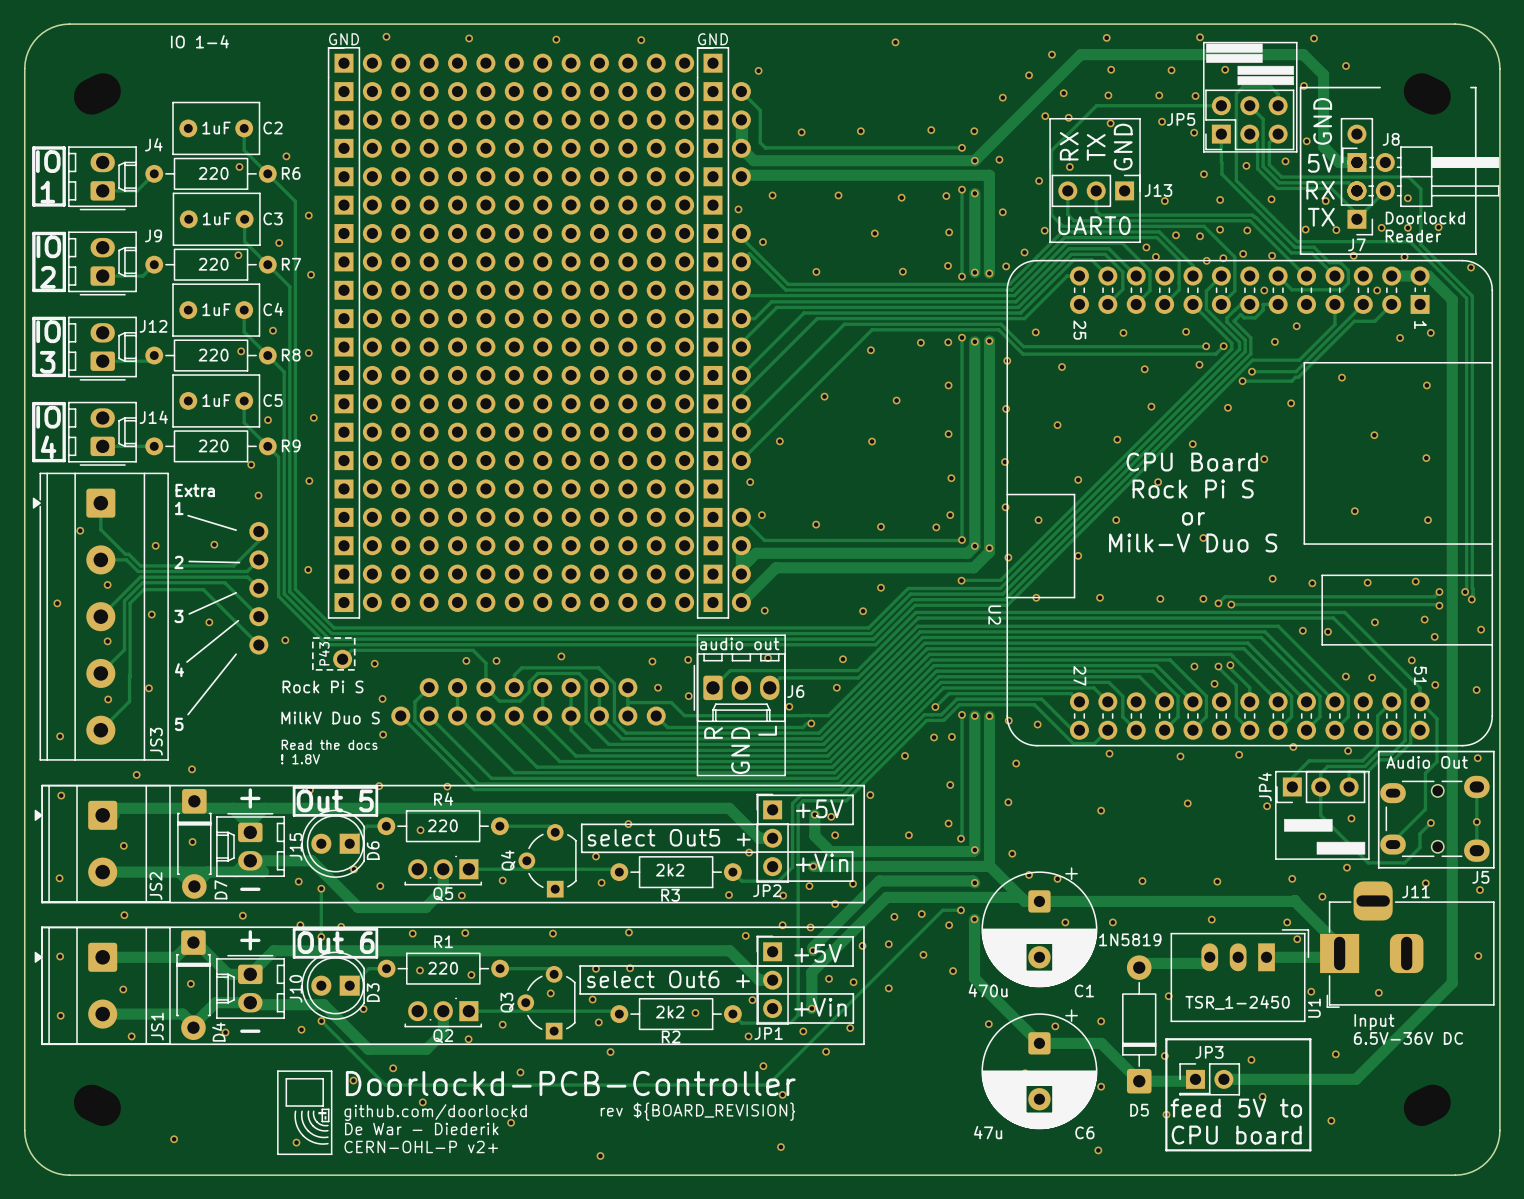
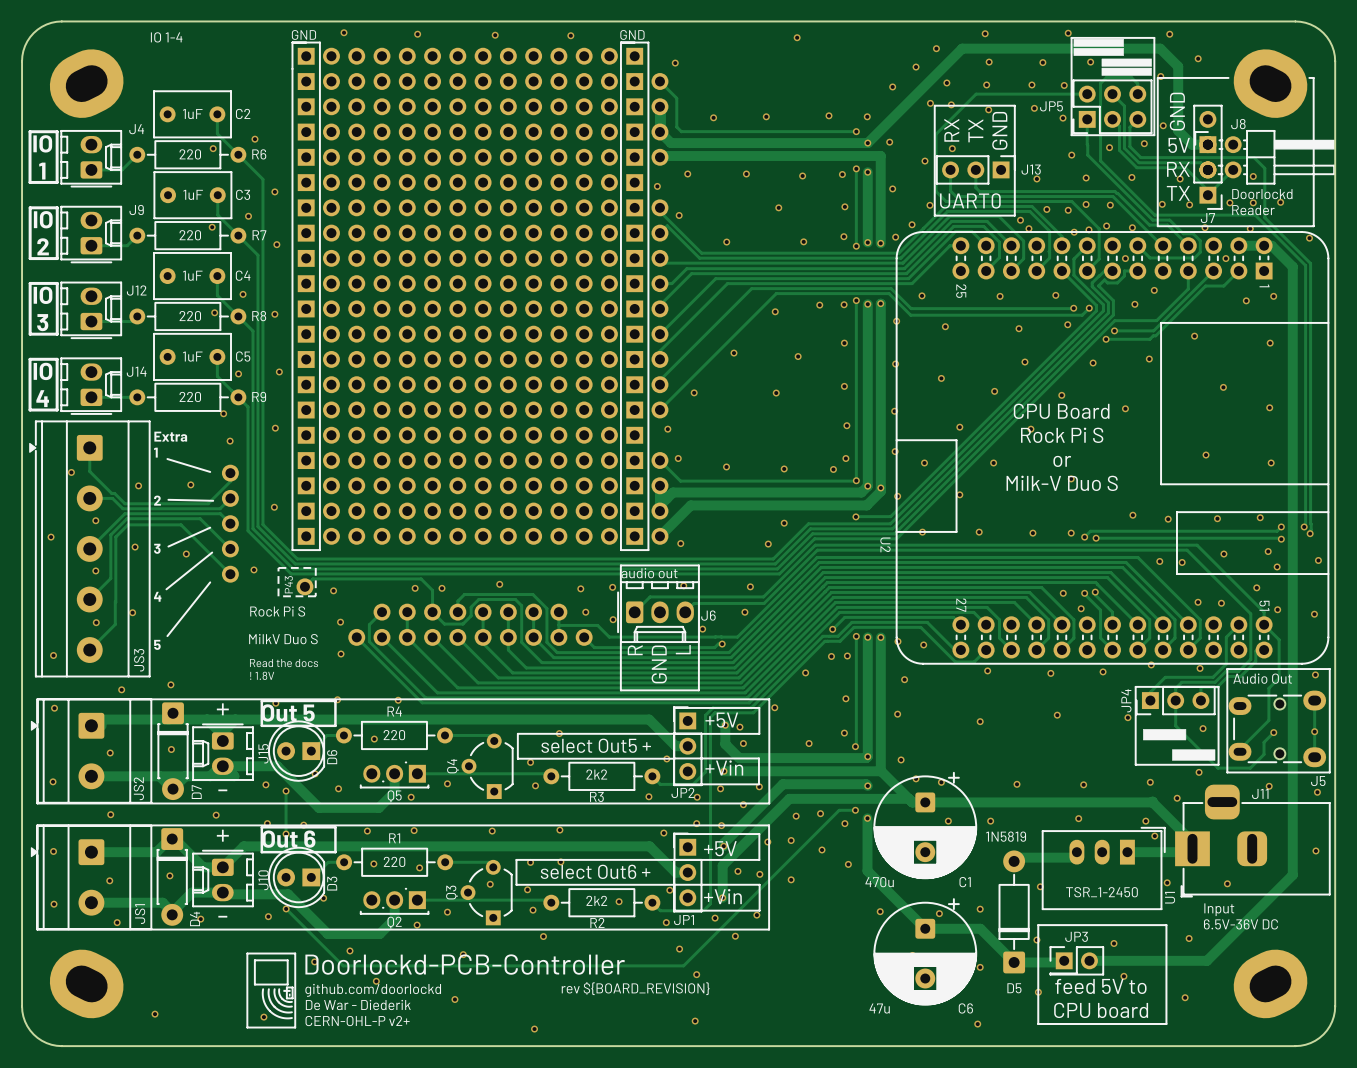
part footprint: [73, 73, 121, 115] -> [49, 49, 124, 118]
part footprint: [1403, 73, 1451, 115] -> [1233, 49, 1308, 118]
part footprint: [73, 1084, 121, 1127] -> [49, 949, 124, 1019]
part footprint: [1403, 1084, 1451, 1127] -> [1233, 949, 1308, 1019]

